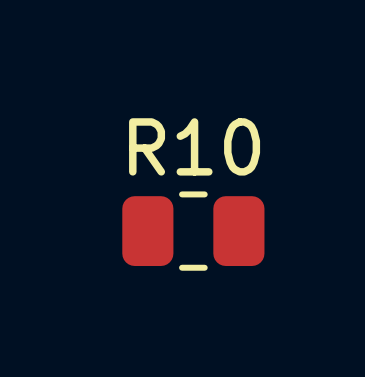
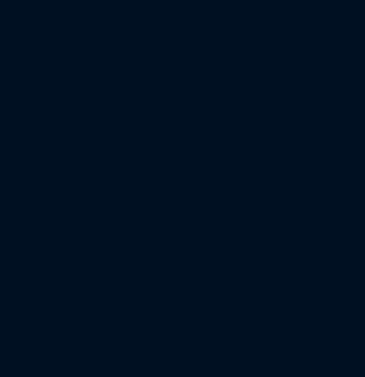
R10: (193, 231) -> none

